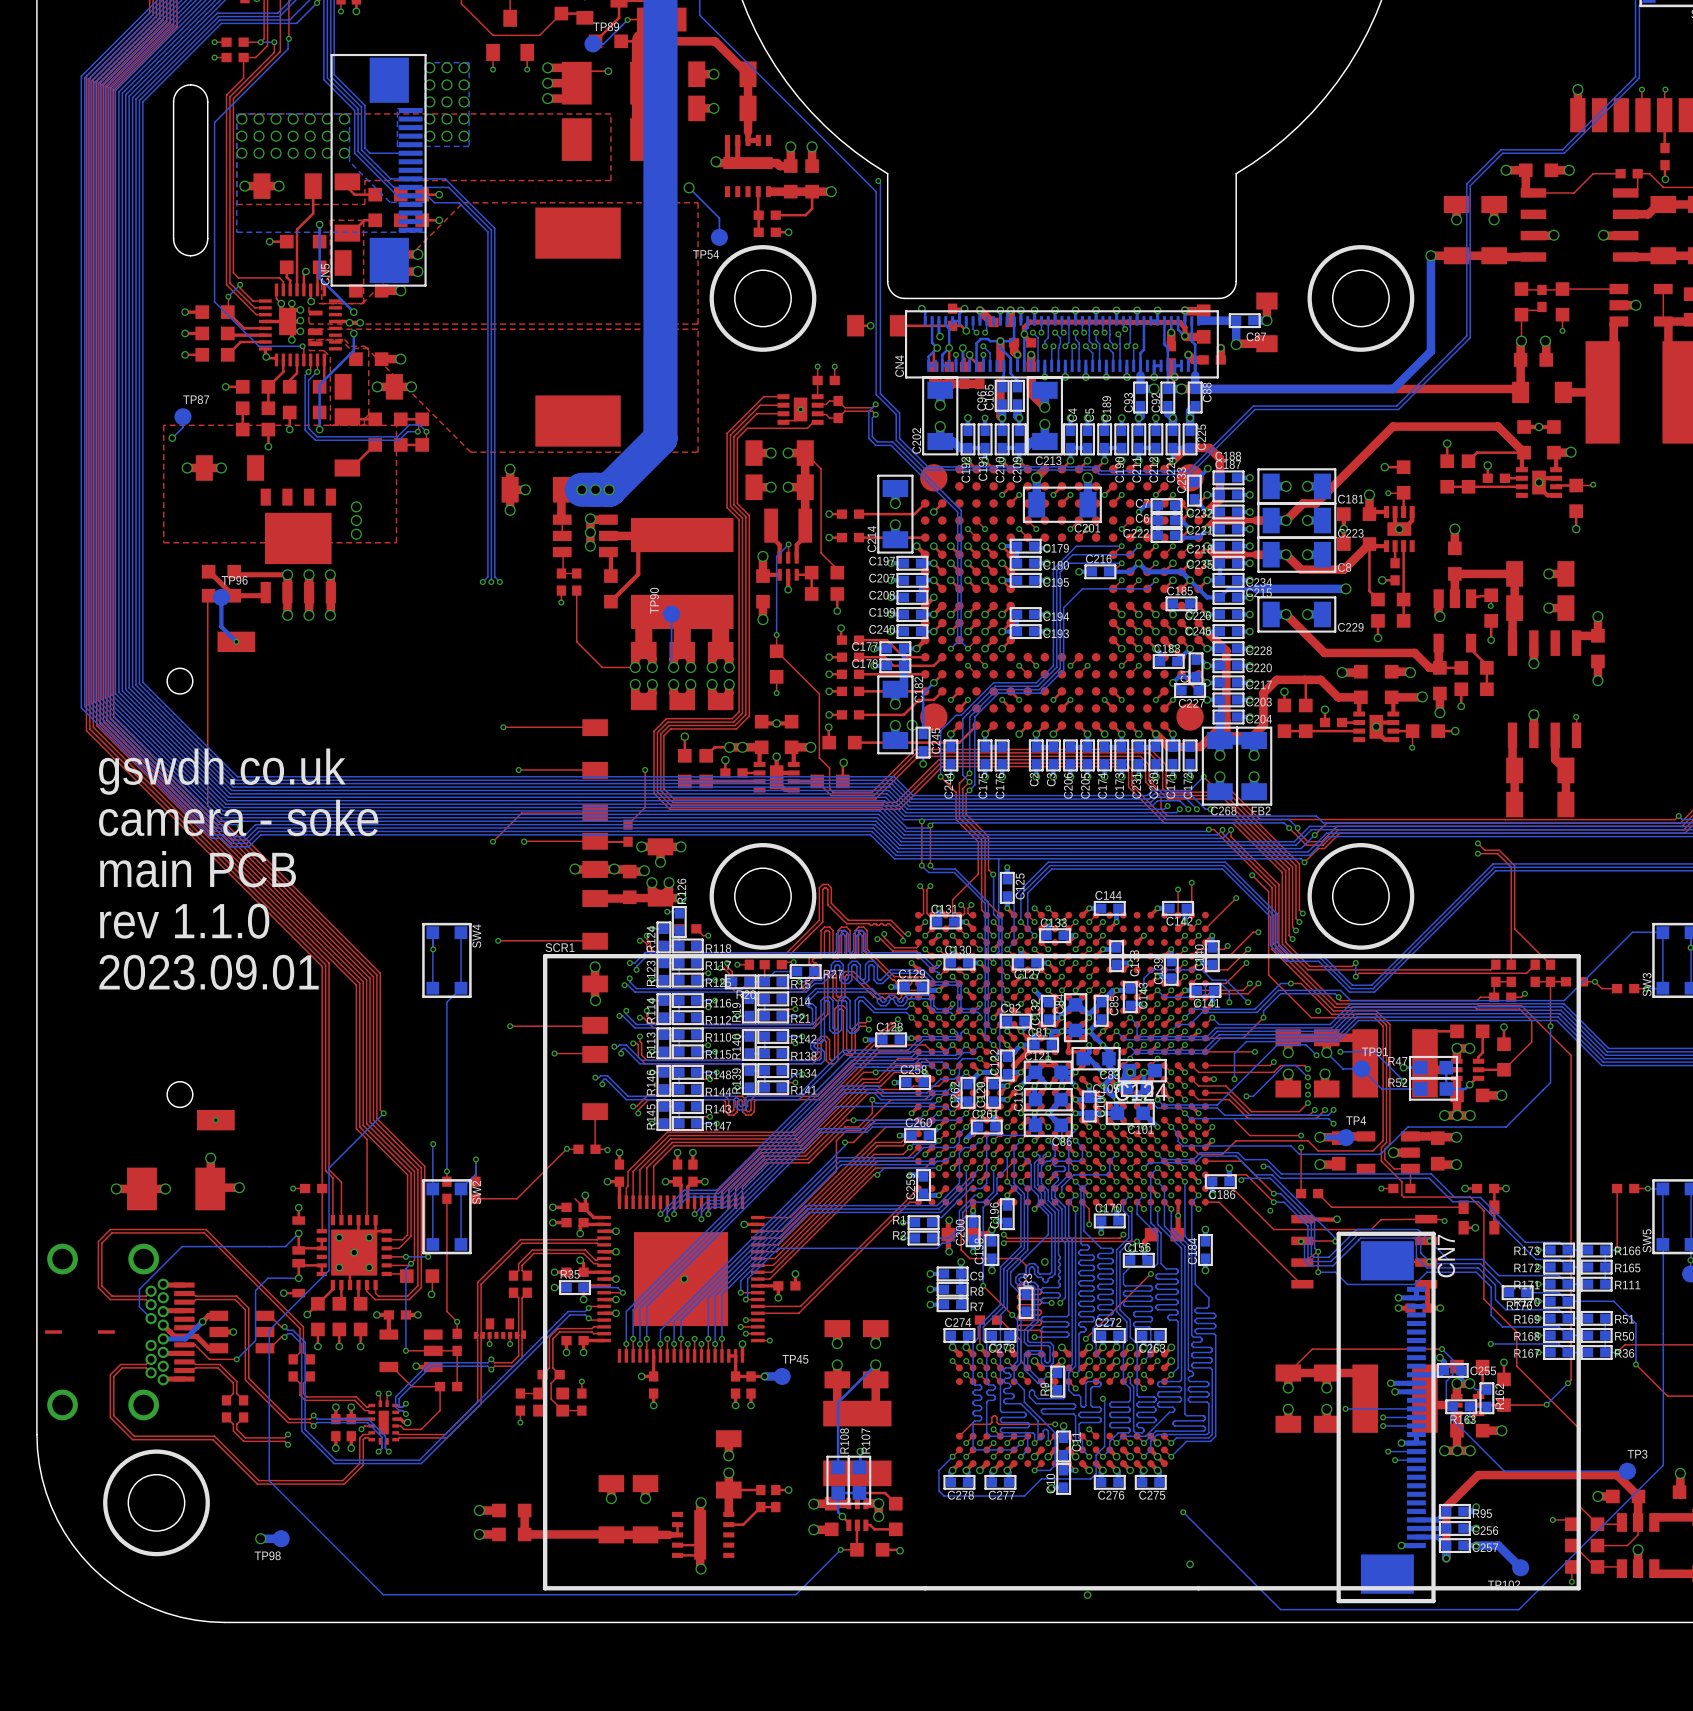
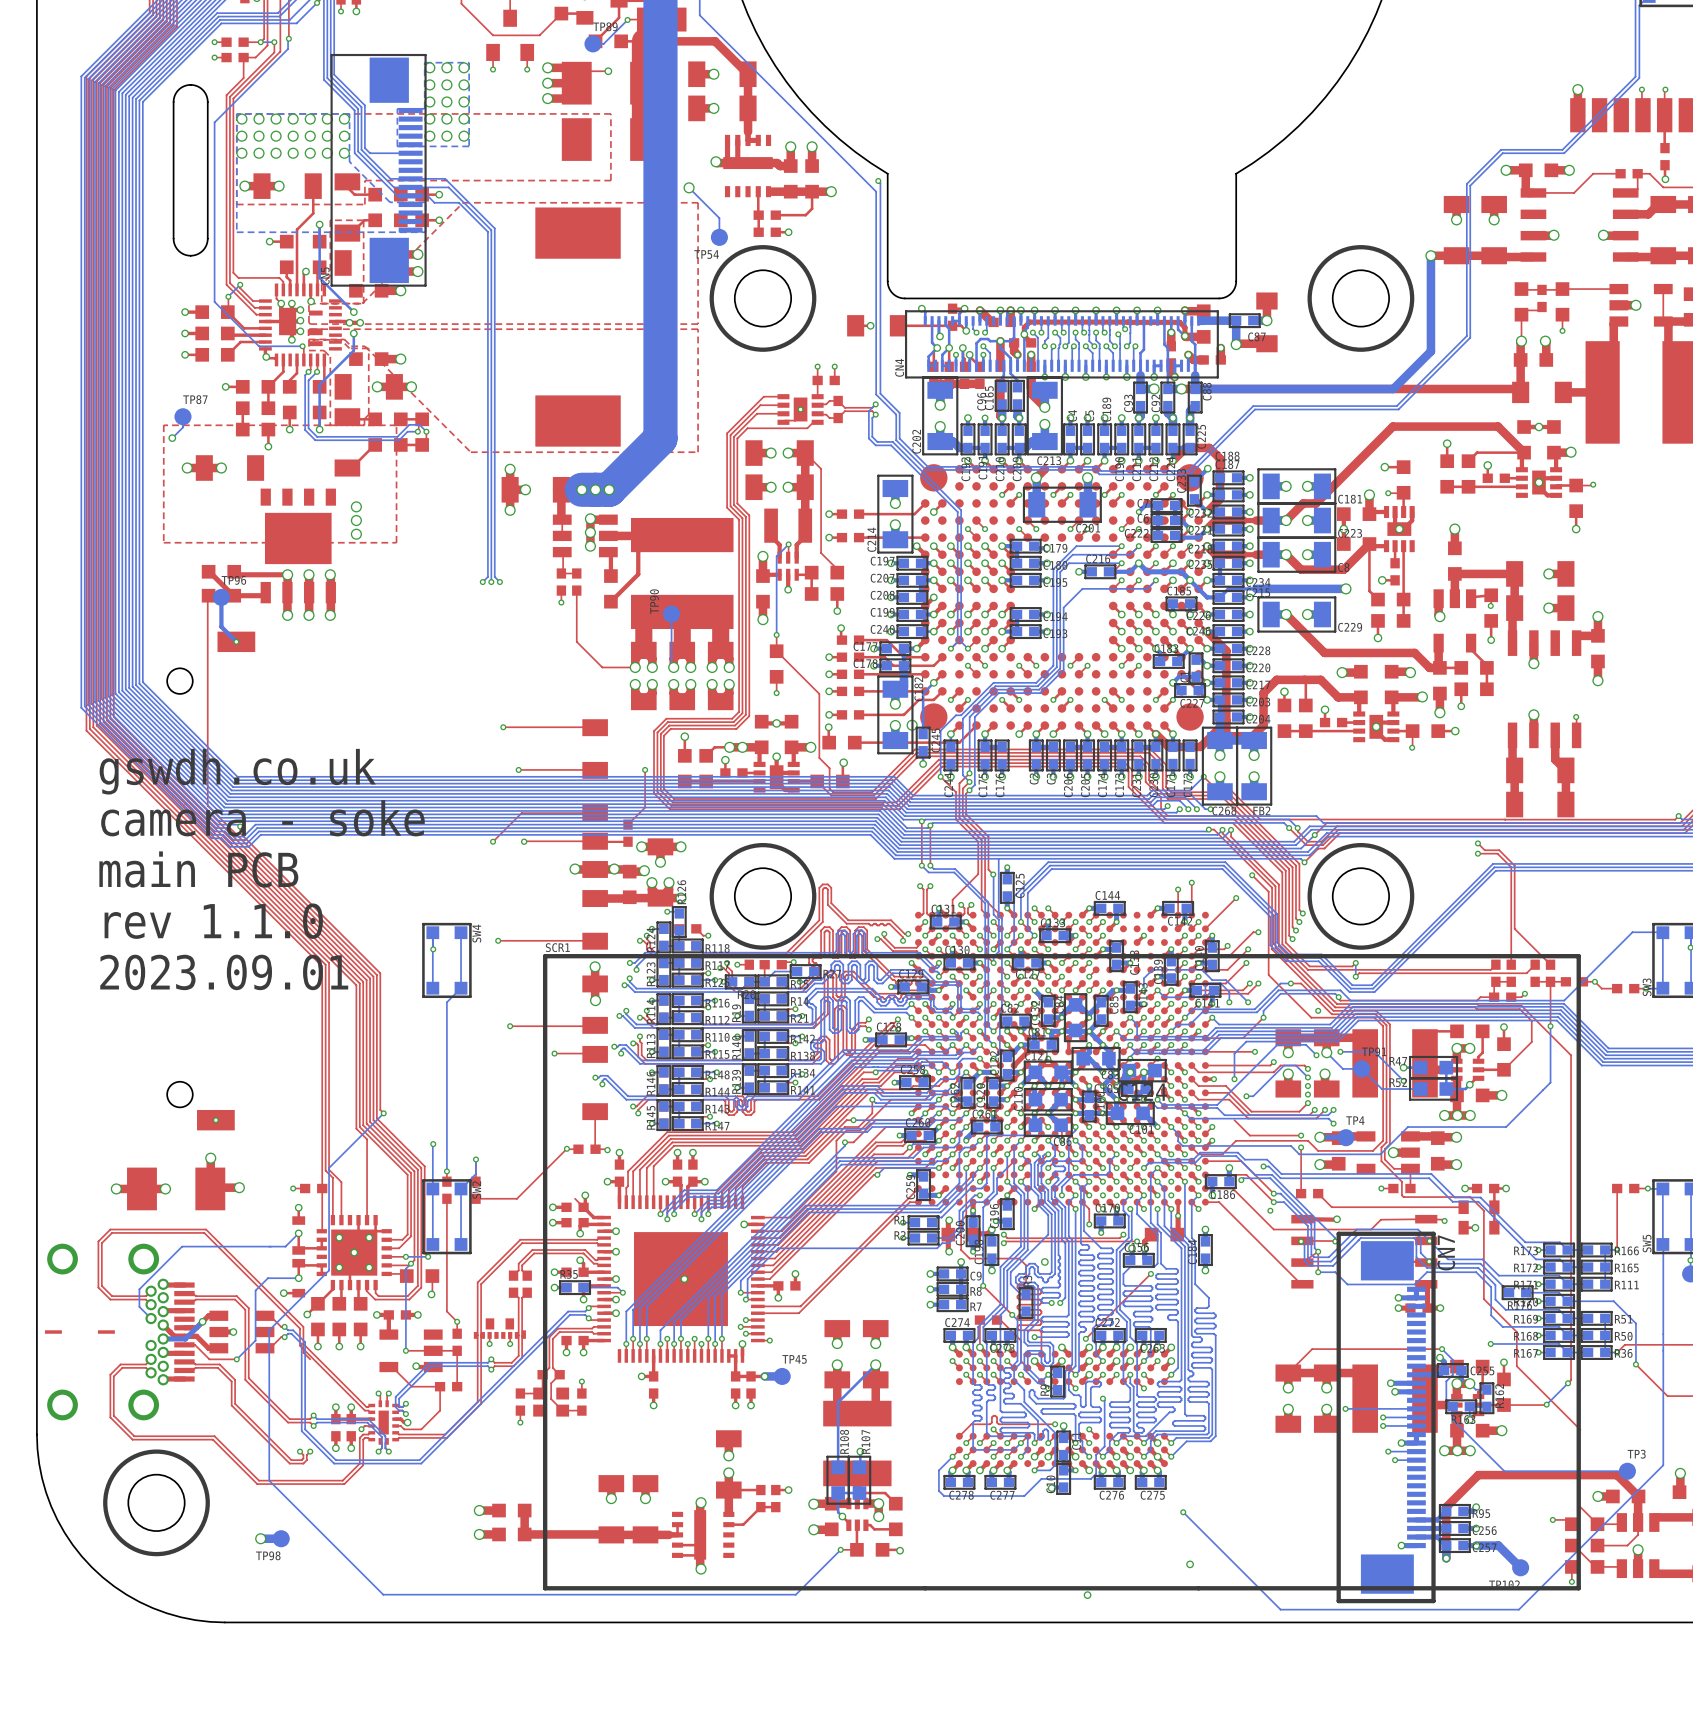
top track: (300, 1345) (300, 1352) (293, 1359) -> none
part: (293, 1367) -> none
part: (310, 1367) -> none
top track: (293, 1376) (300, 1383) (300, 1395) (305, 1400) (354, 1400) -> (300, 1345) (354, 1400)
top track: (310, 1376) (303, 1383) (303, 1393) (306, 1396) (356, 1396) -> (303, 1343) (356, 1396)
top track: (235, 1379) (236, 1393) (243, 1400) -> (235, 1379) (235, 1403) (291, 1460) (301, 1460) (303, 1455) (300, 1451)
top track: (231, 1381) (233, 1393) (226, 1400) -> (231, 1381) (231, 1405) (289, 1463) (303, 1463) (310, 1451)
part: (226, 1408) -> none
part: (243, 1408) -> none
top track: (226, 1417) (233, 1424) (233, 1431) (243, 1441) (284, 1441) (288, 1444) -> none
top track: (243, 1417) (236, 1424) (236, 1429) (245, 1437) (284, 1437) (288, 1434) -> none
via: (288, 1434) -> none
via: (288, 1444) -> none
via: none -> (300, 1451)
via: none -> (310, 1451)

